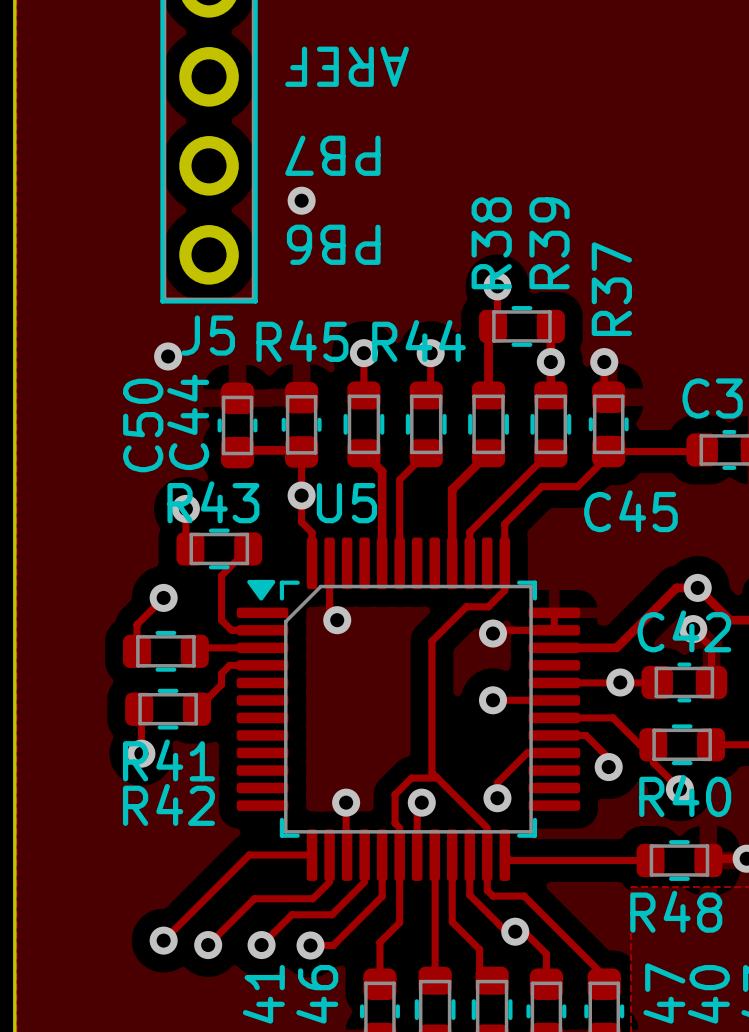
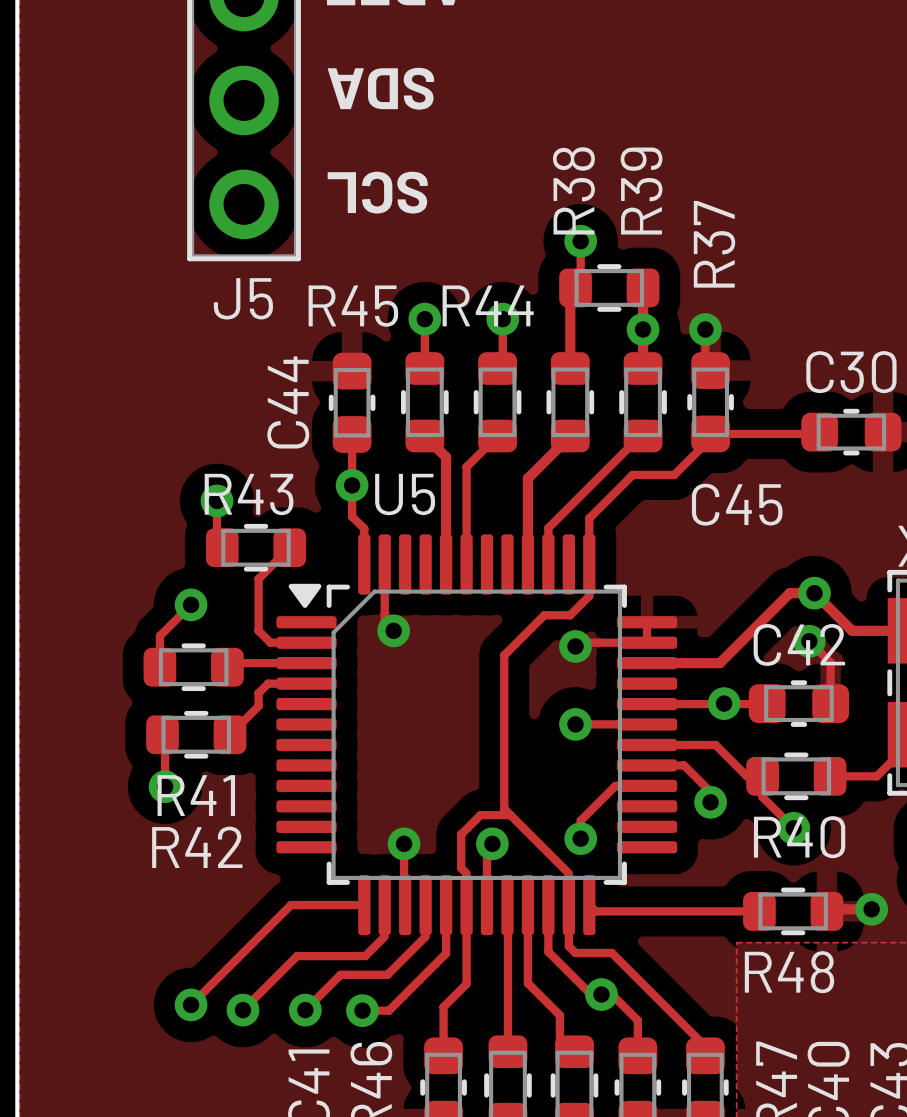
text: PB7 (332, 155) -> SDA (380, 88)
via: (301, 200) -> none
text: PB6 (333, 244) -> SCL (377, 192)
via: (168, 356) -> none
C44 name position: C44 (188, 422) -> C44 (288, 402)
C50: (237, 425) -> none
track: (238, 450) (300, 450) (301, 451) -> none

